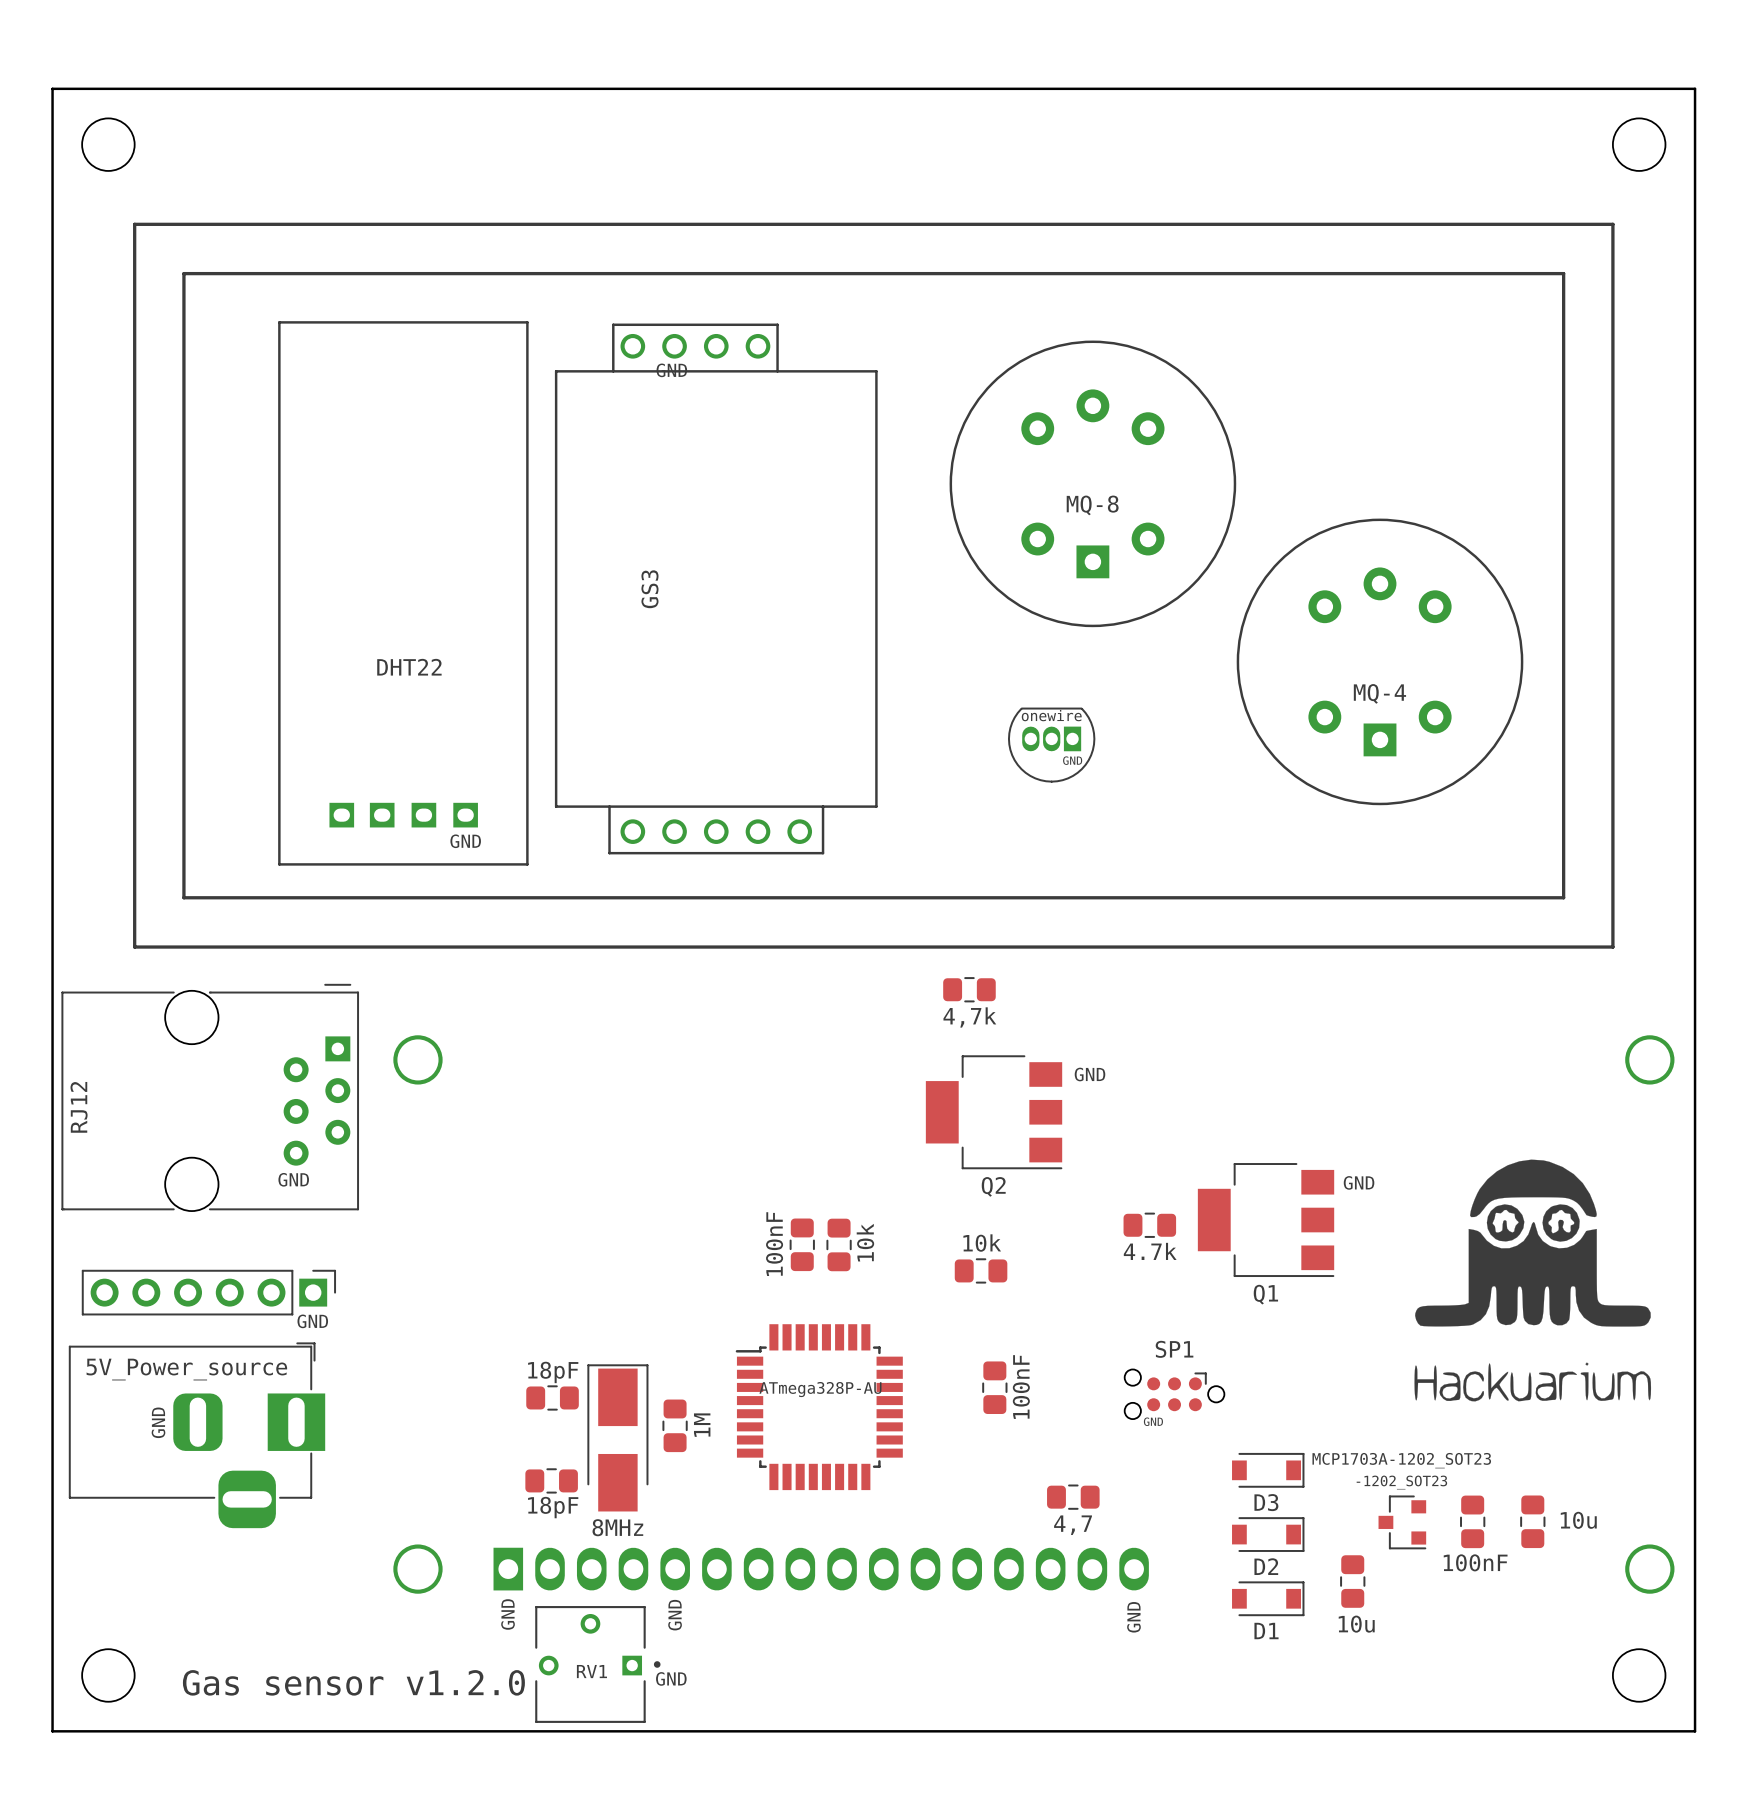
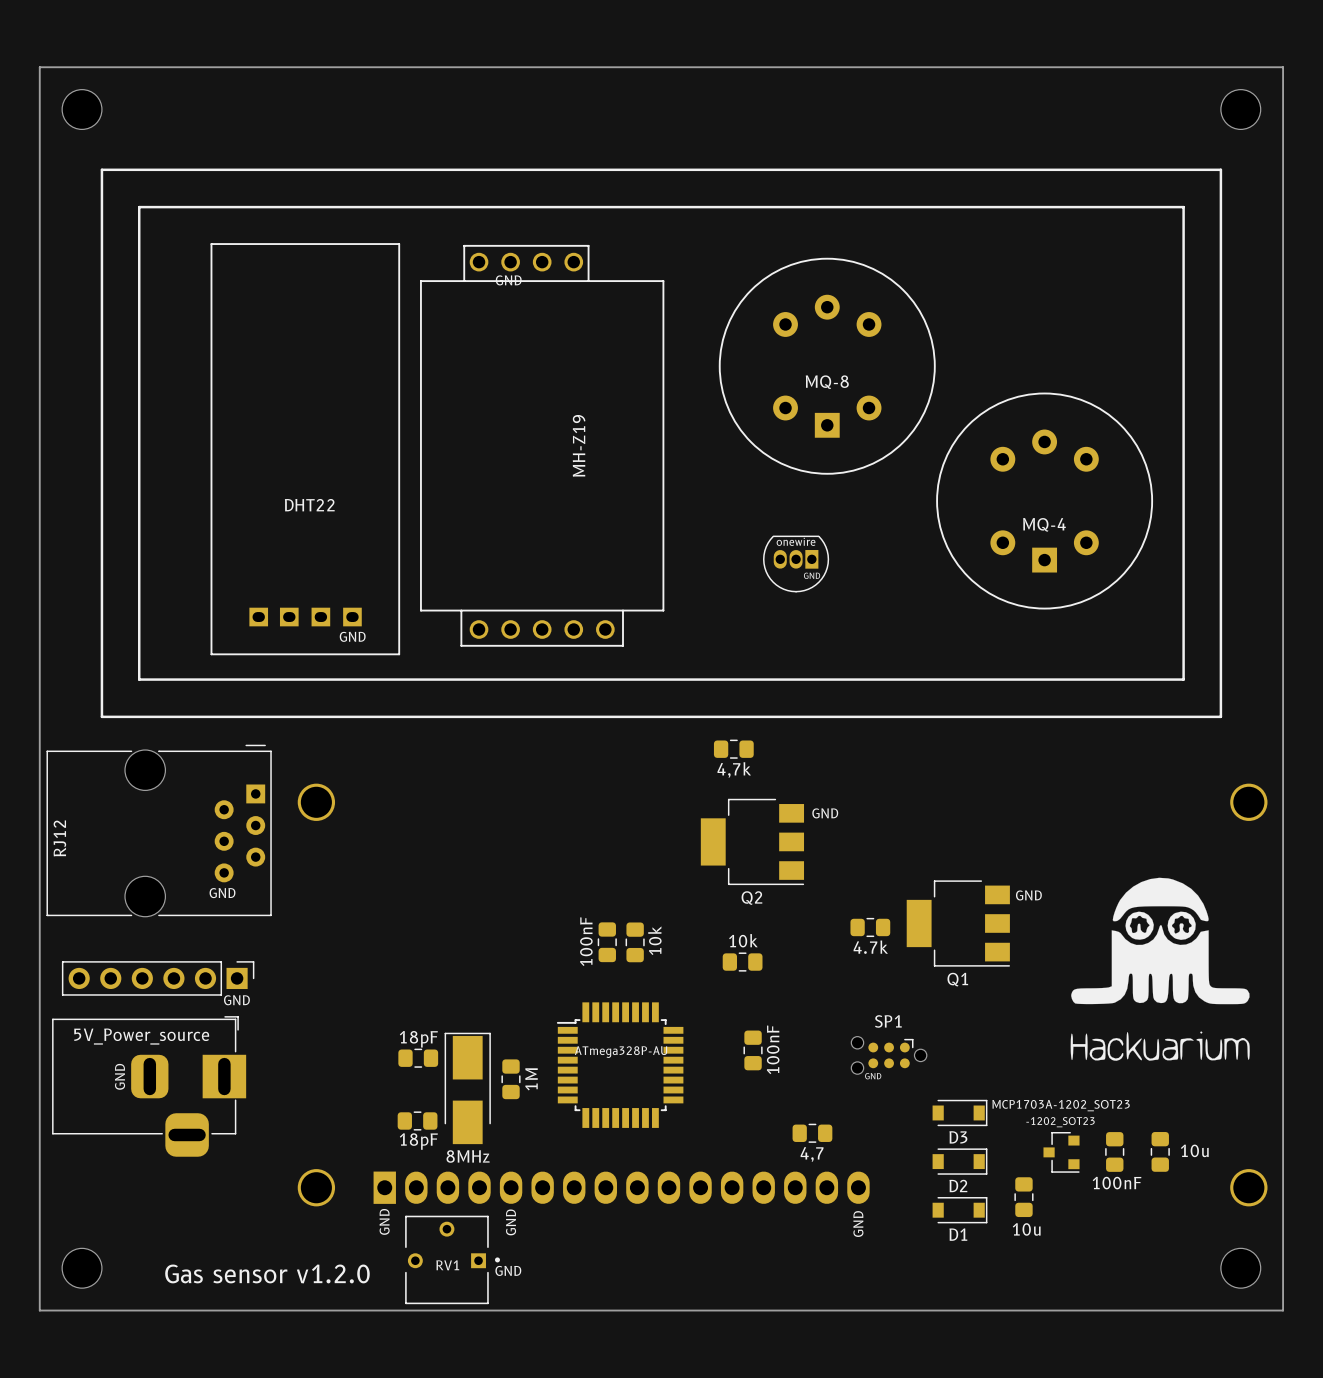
GS3 name: GS3 (649, 589) -> none
GS3 value: none -> MH-Z19 (579, 445)

